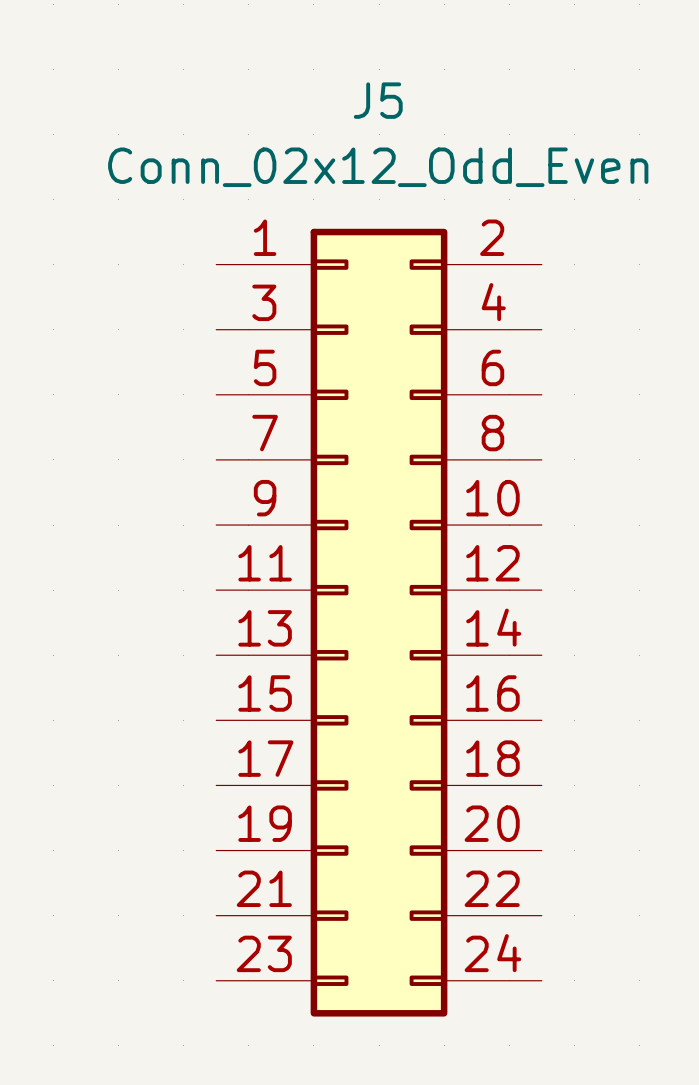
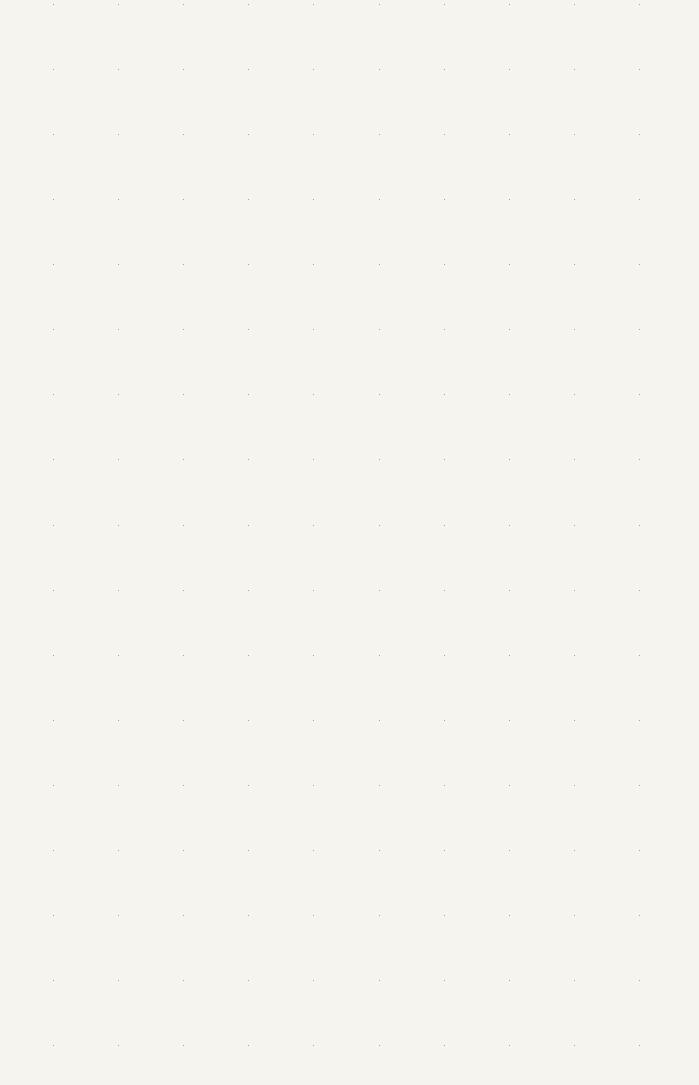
J5: Conn_02x12_Odd_Even (379, 622) -> none

